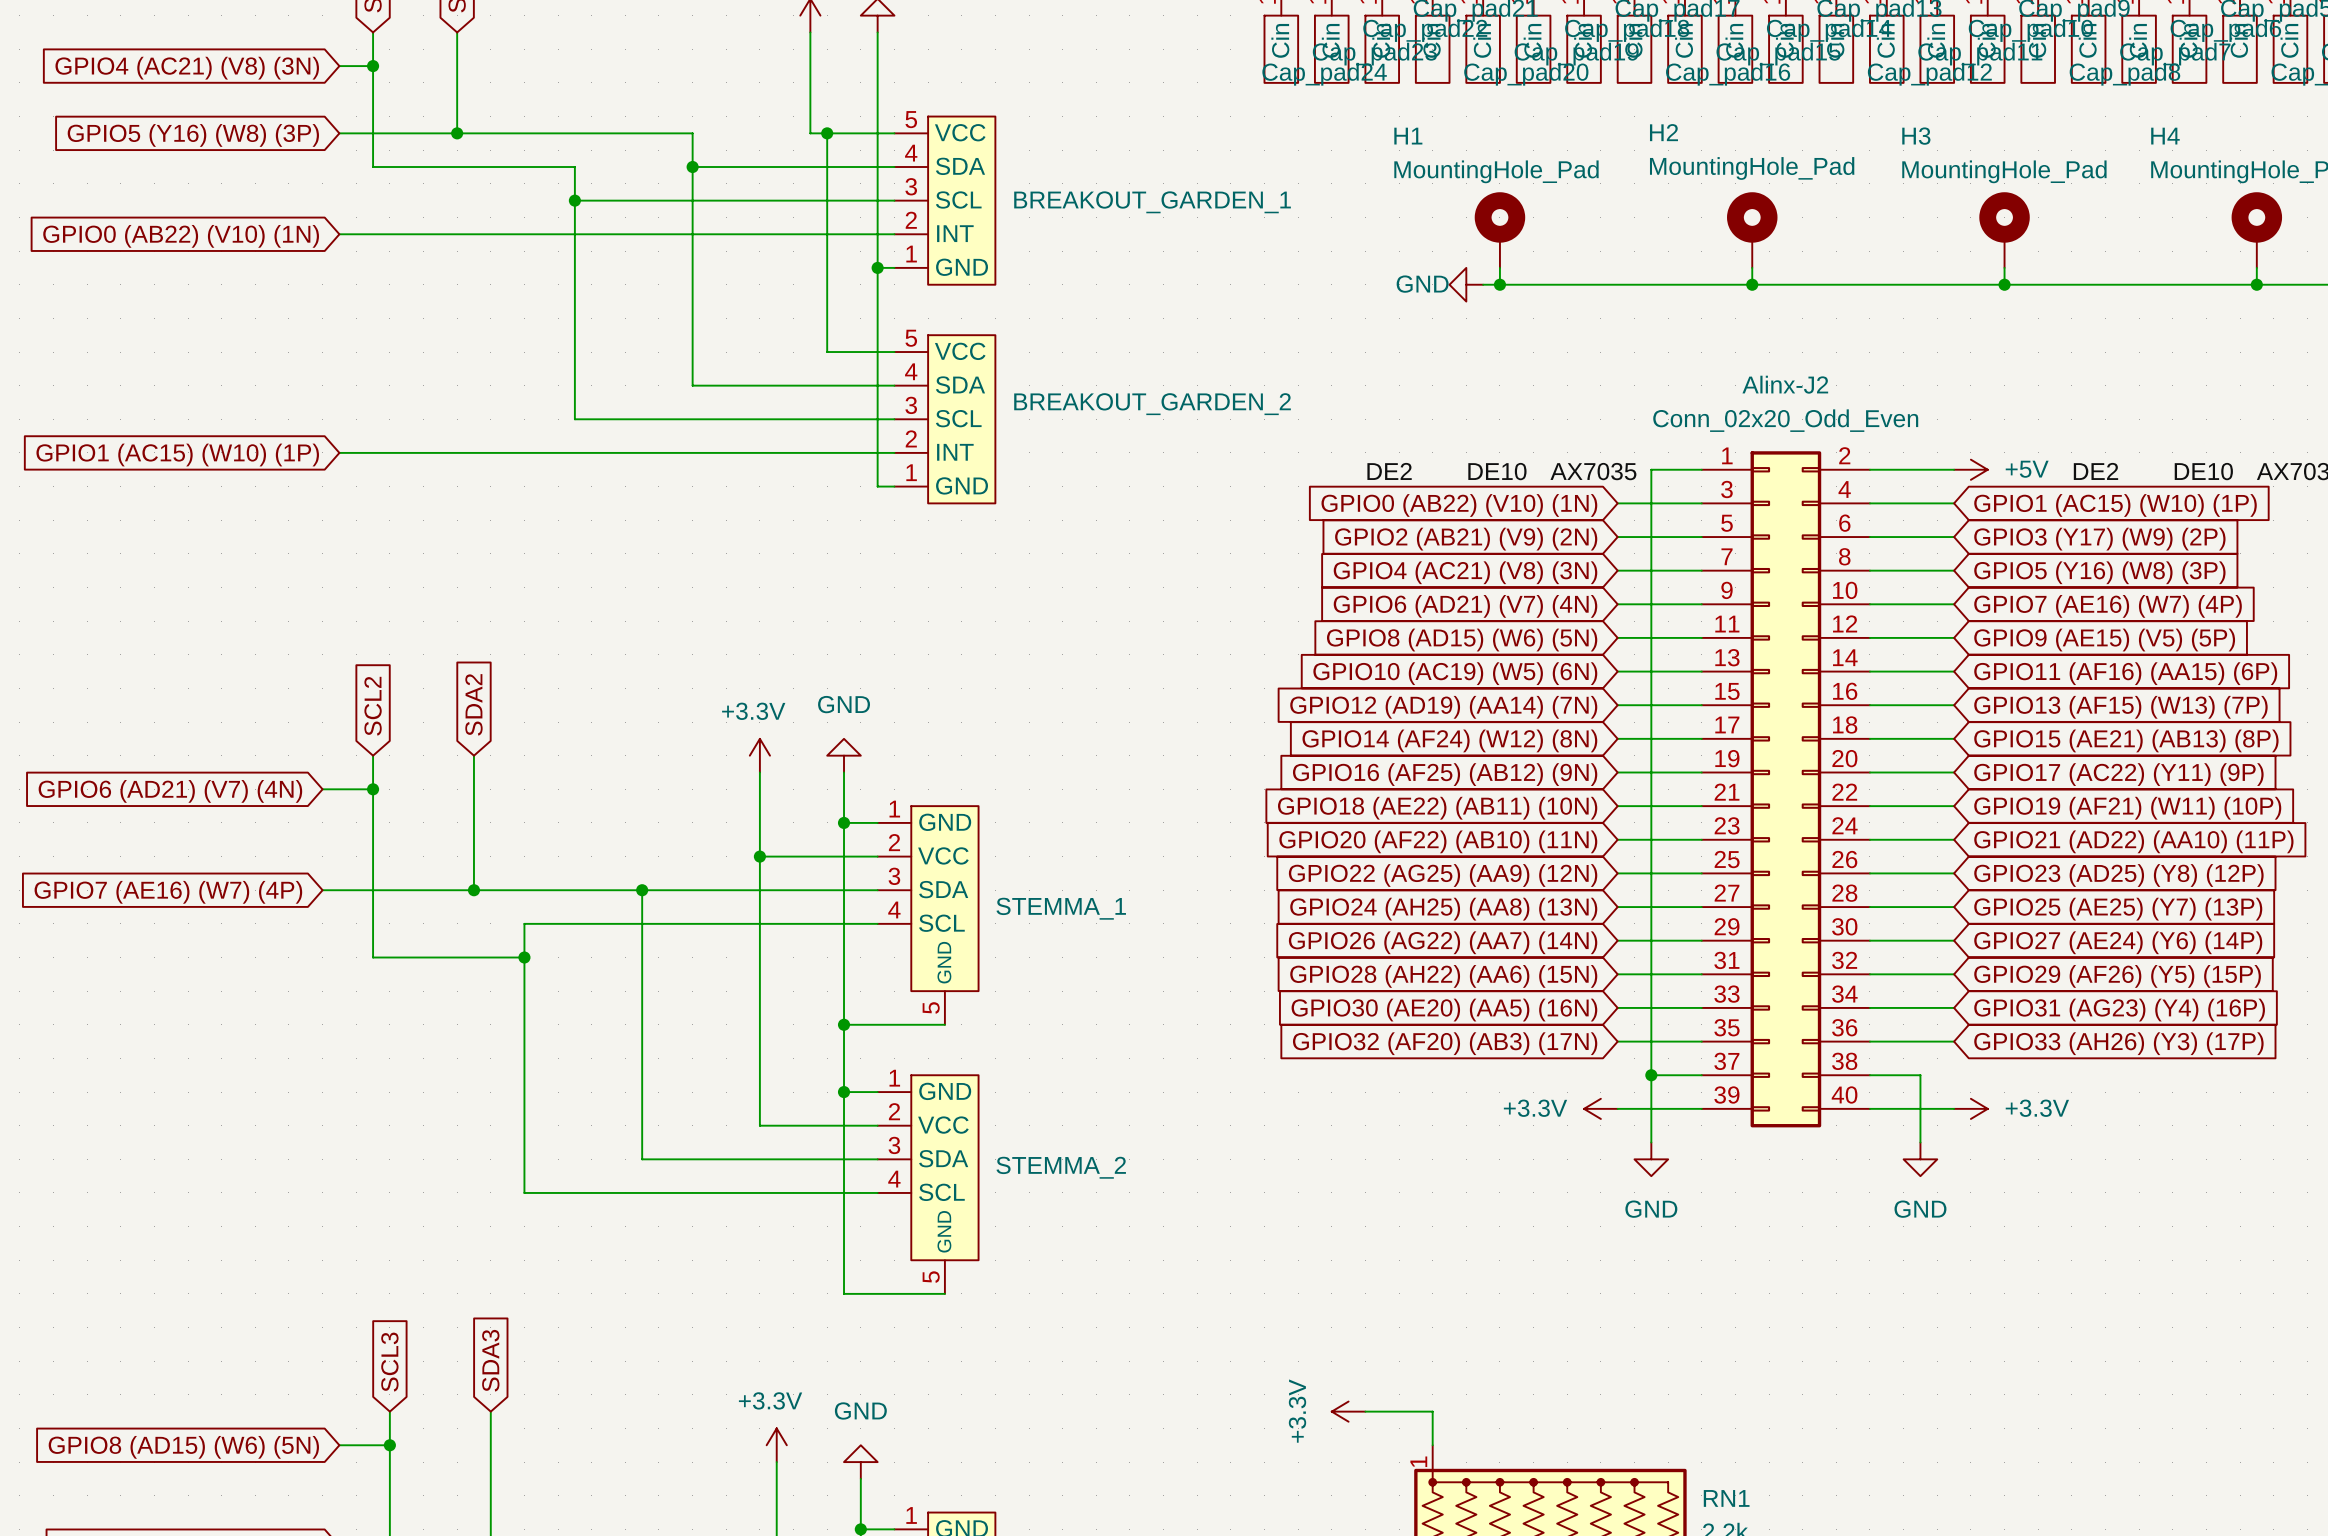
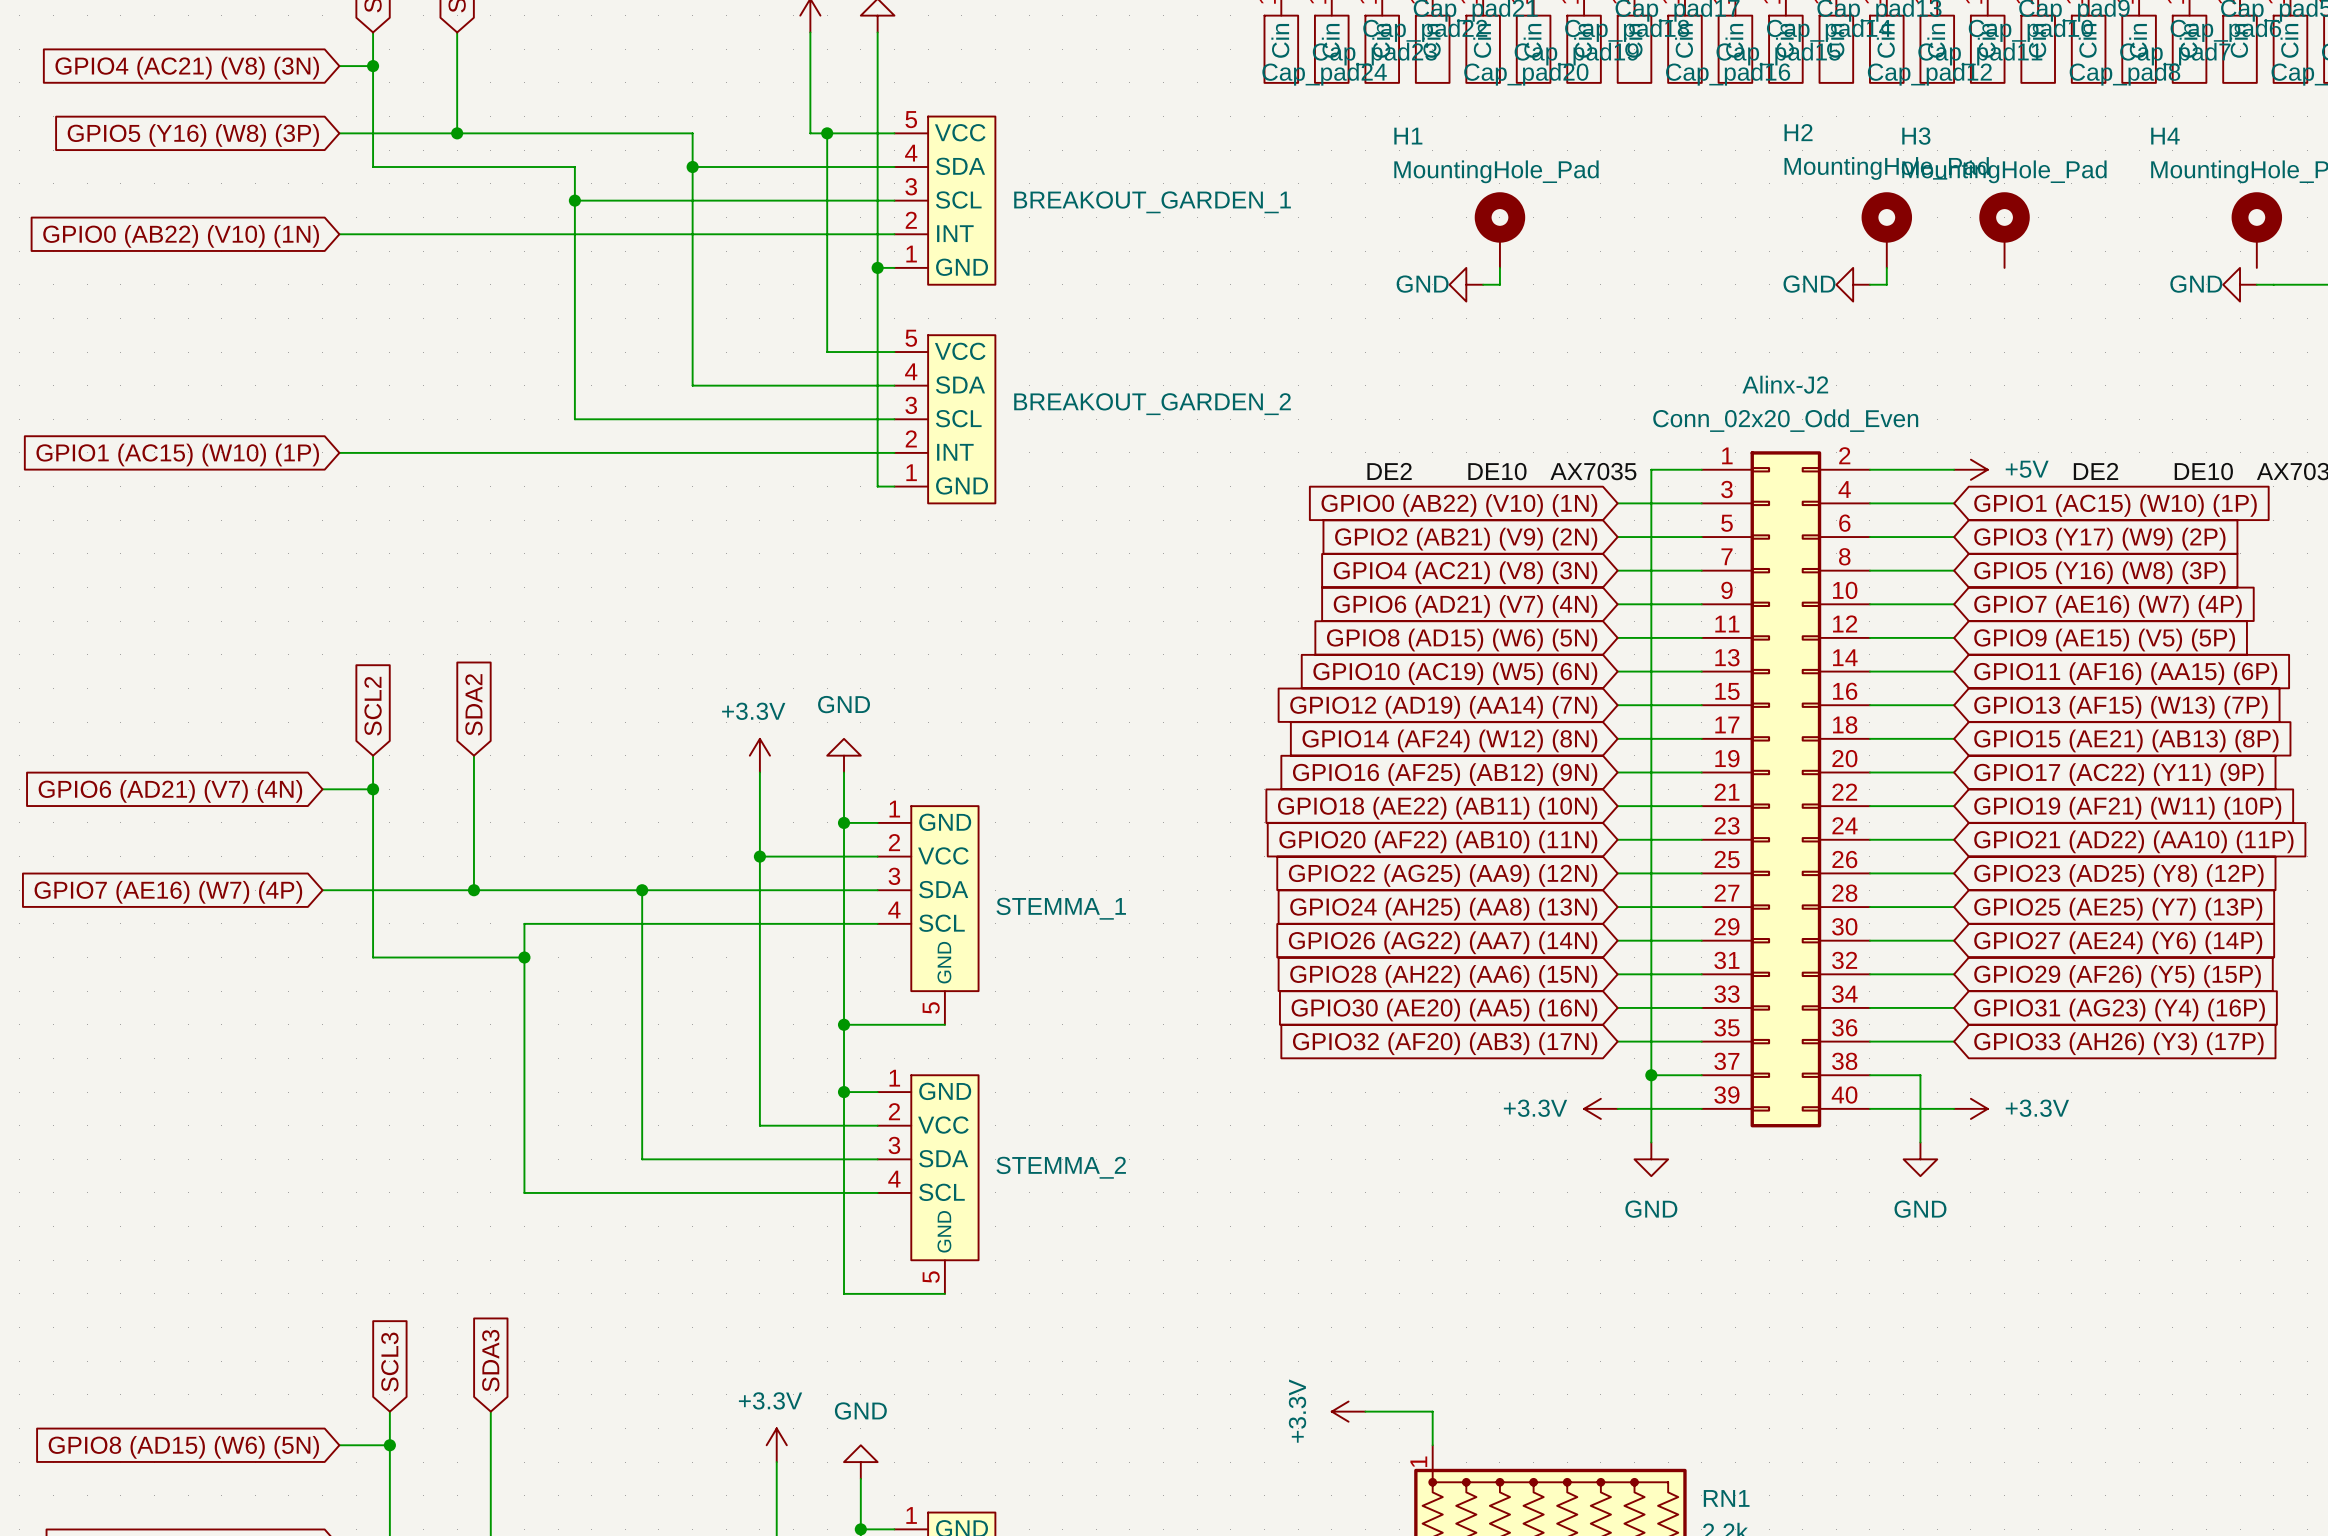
H2 position: (1752, 230) -> (1886, 230)
wire: (1752, 267) (1752, 284) -> none
wire: (2004, 267) (2004, 284) -> none
wire: (2256, 267) (2256, 284) (1886, 284) -> (1886, 267) (1886, 284)
wire: (1499, 284) (1869, 284) -> none
junction: (1499, 284) -> none
junction: (1752, 284) -> none
power symbol: none -> GND (1853, 284)
junction: (2004, 284) -> none
power symbol: none -> GND (2240, 284)
junction: (2256, 284) -> none

